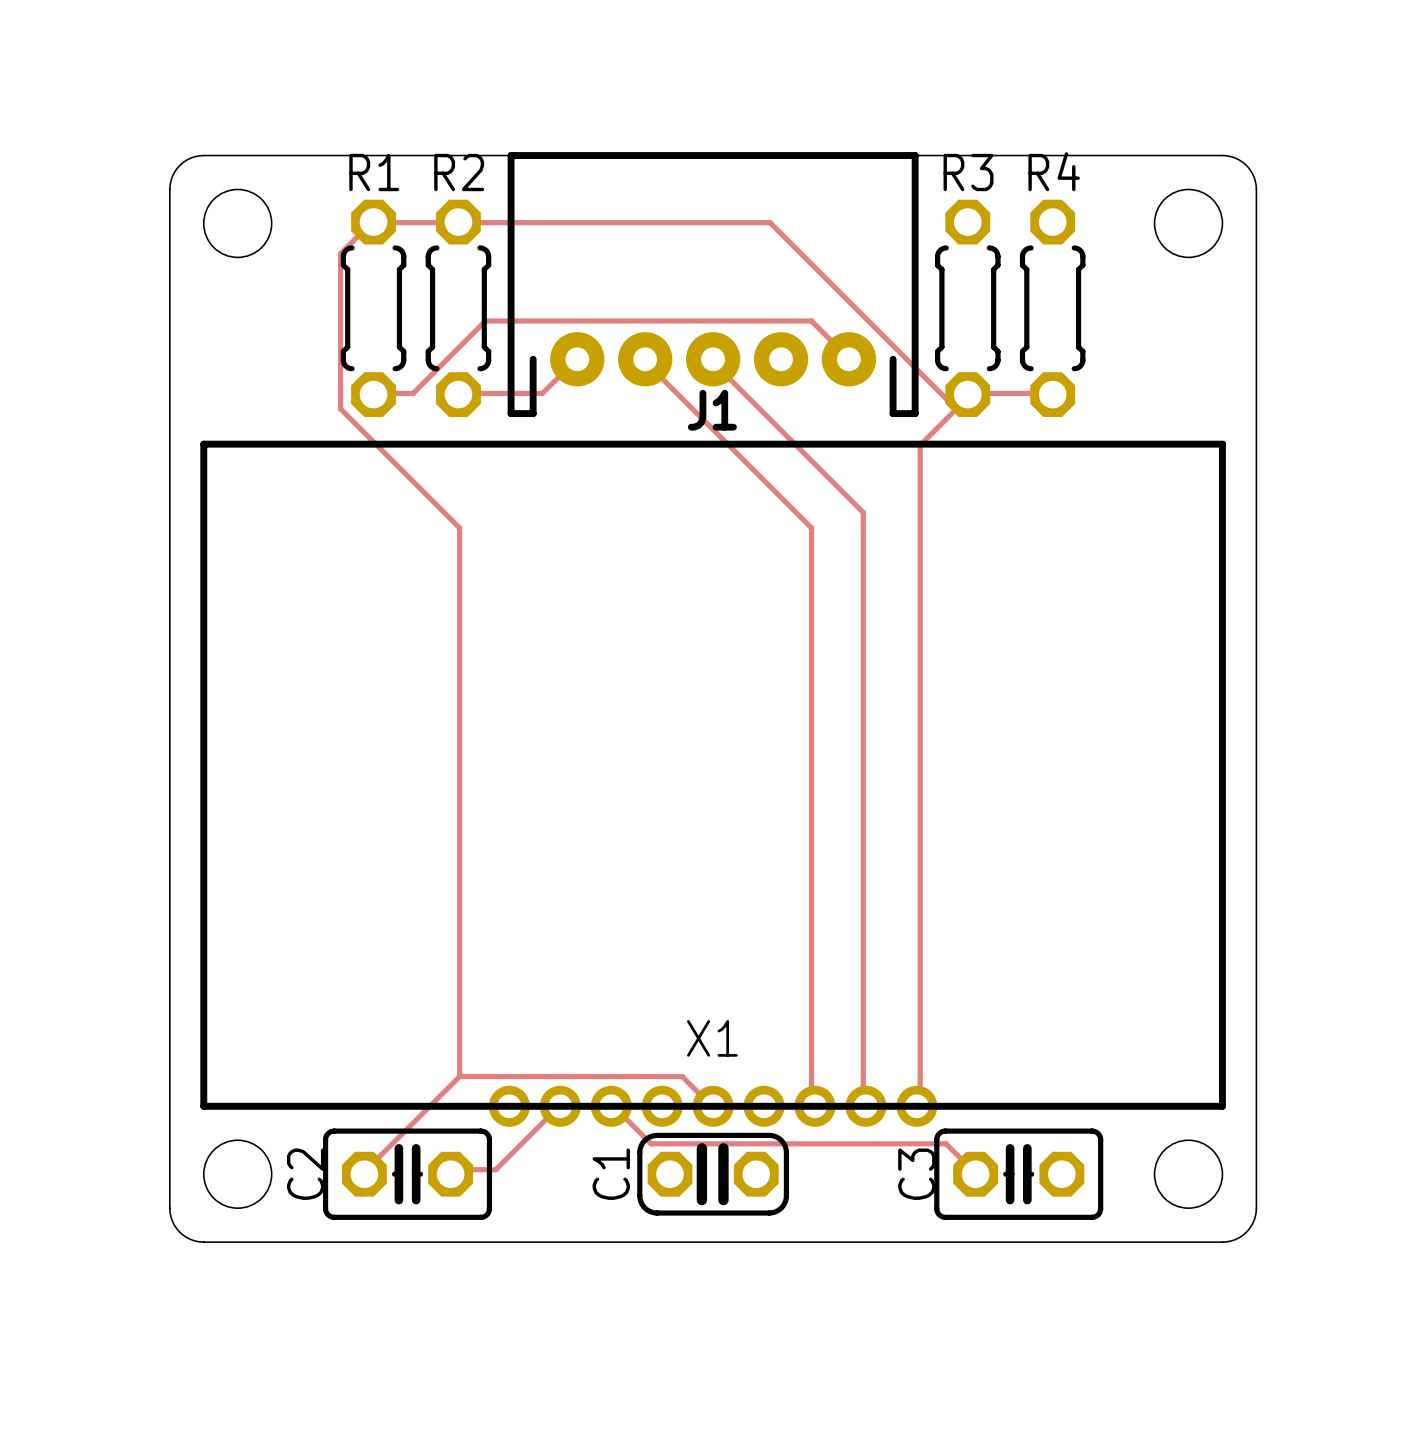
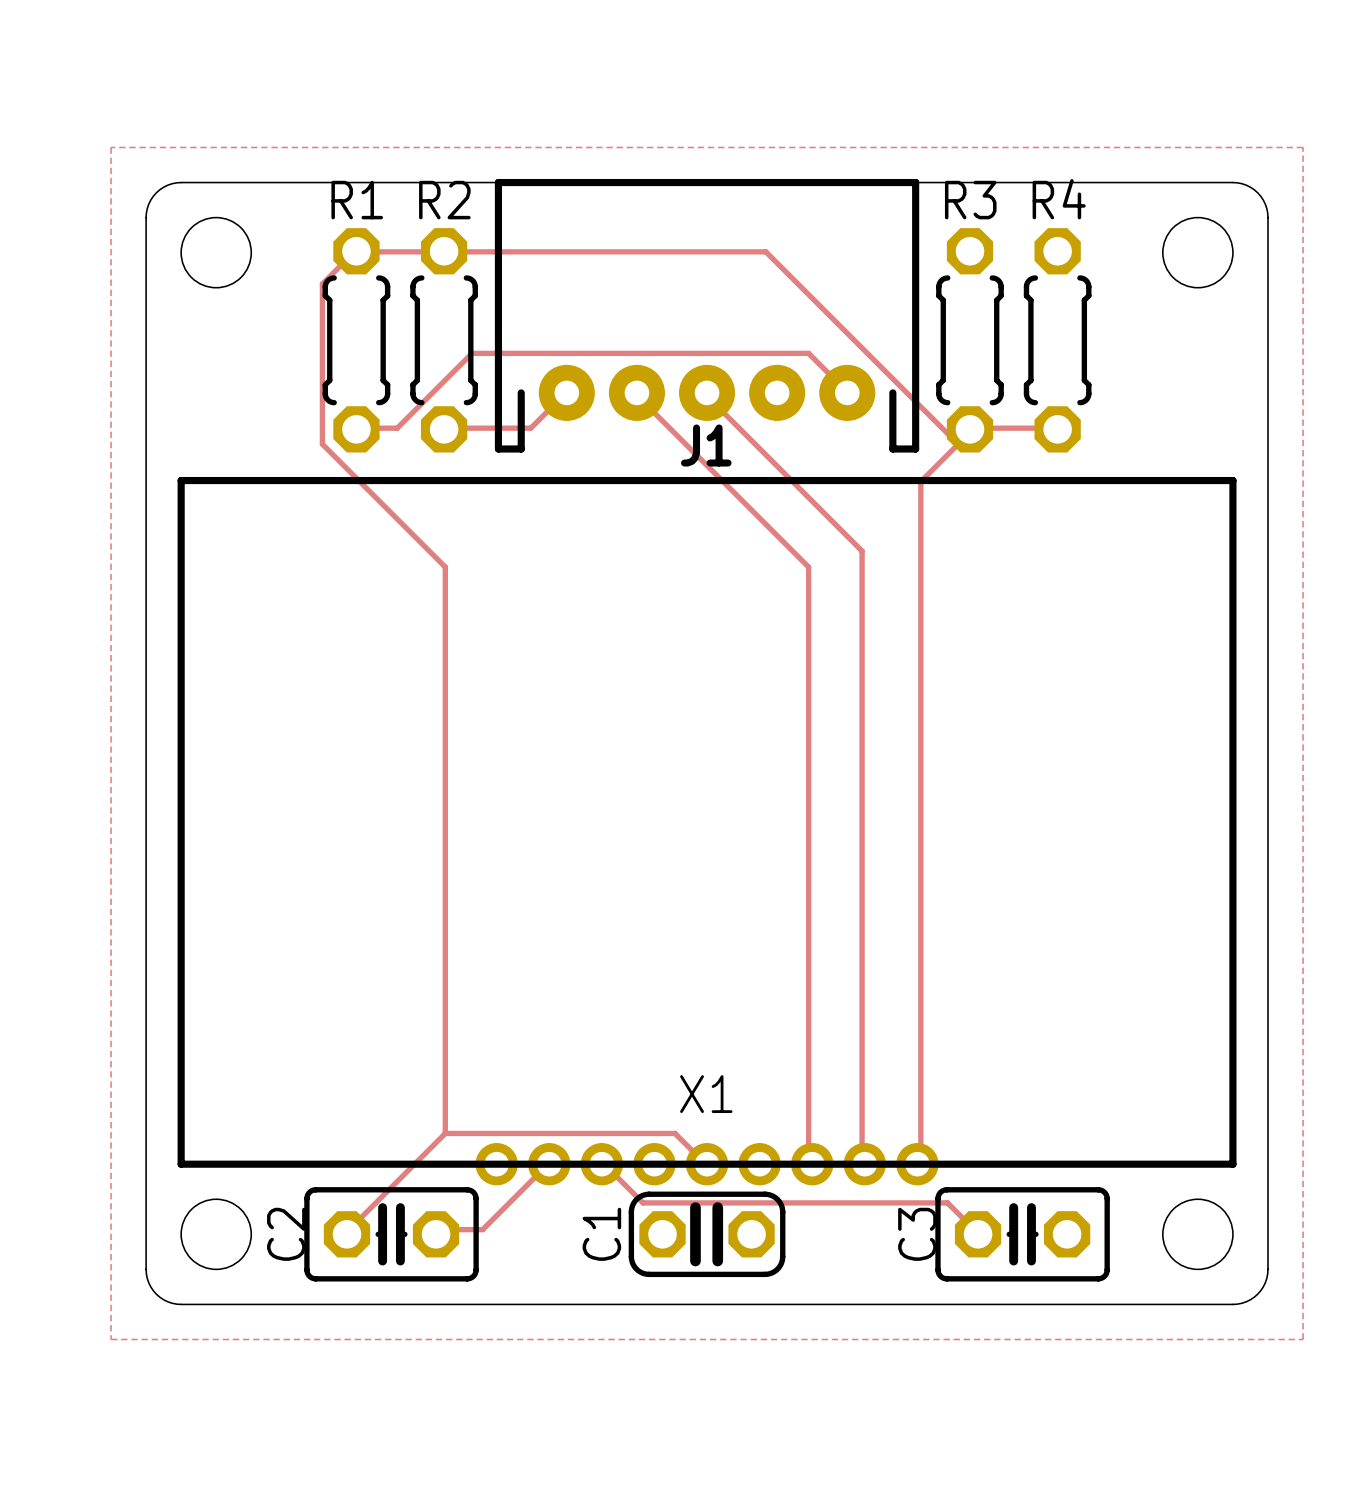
zone outline: none -> (111, 147) (1303, 147) (1303, 1339) (111, 1339) (111, 147)

